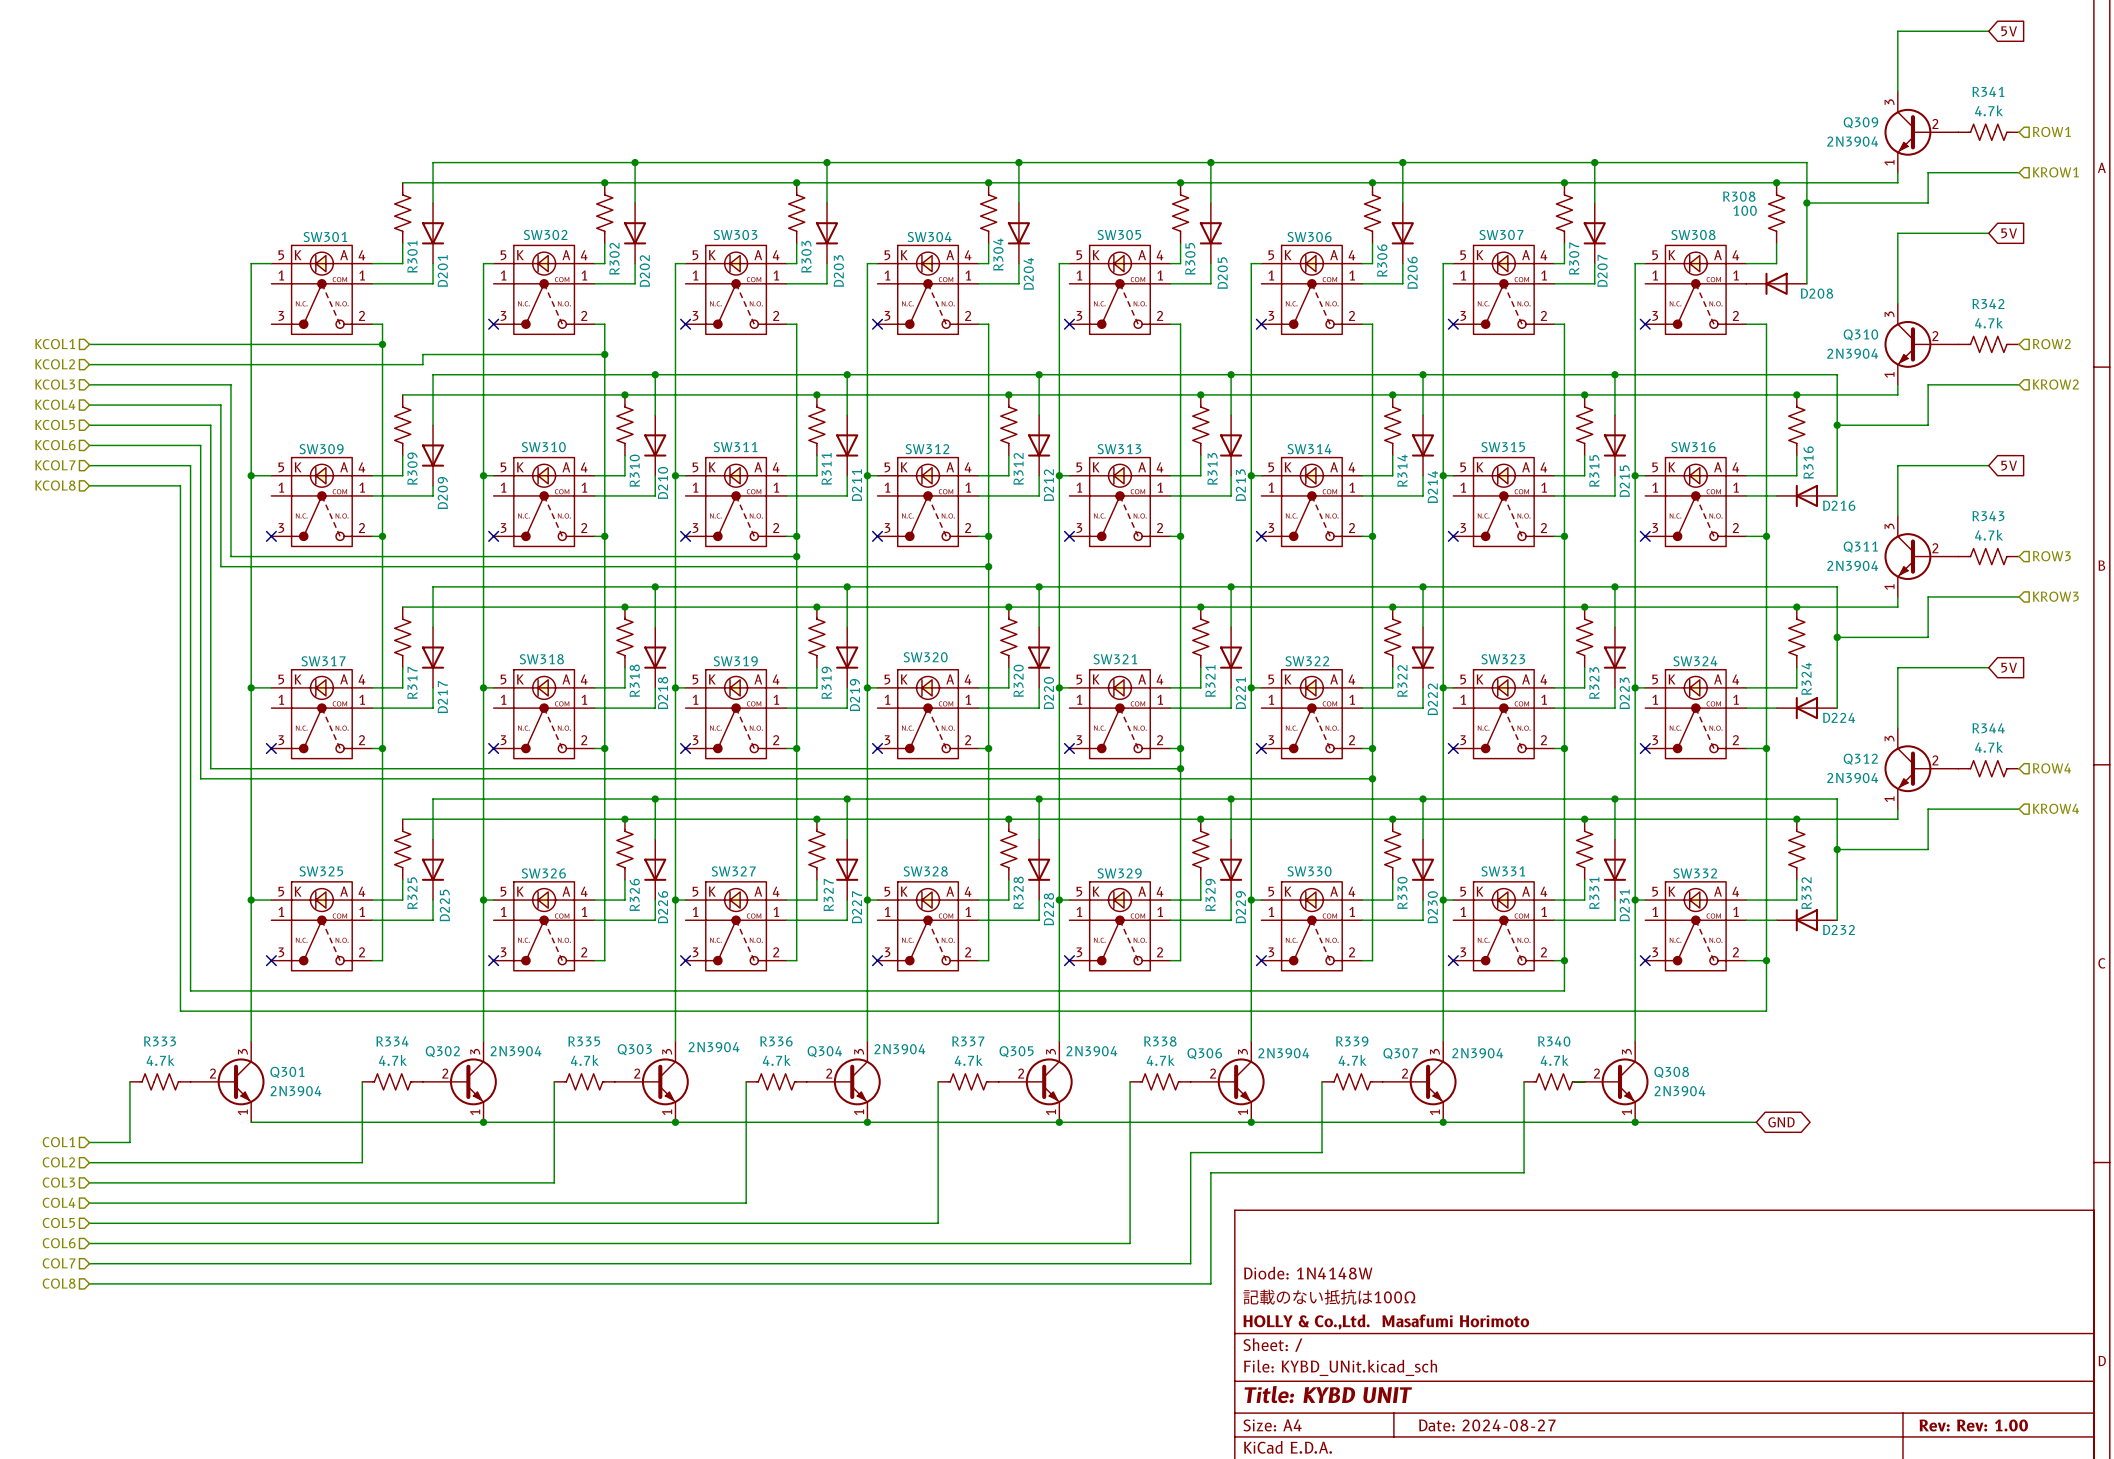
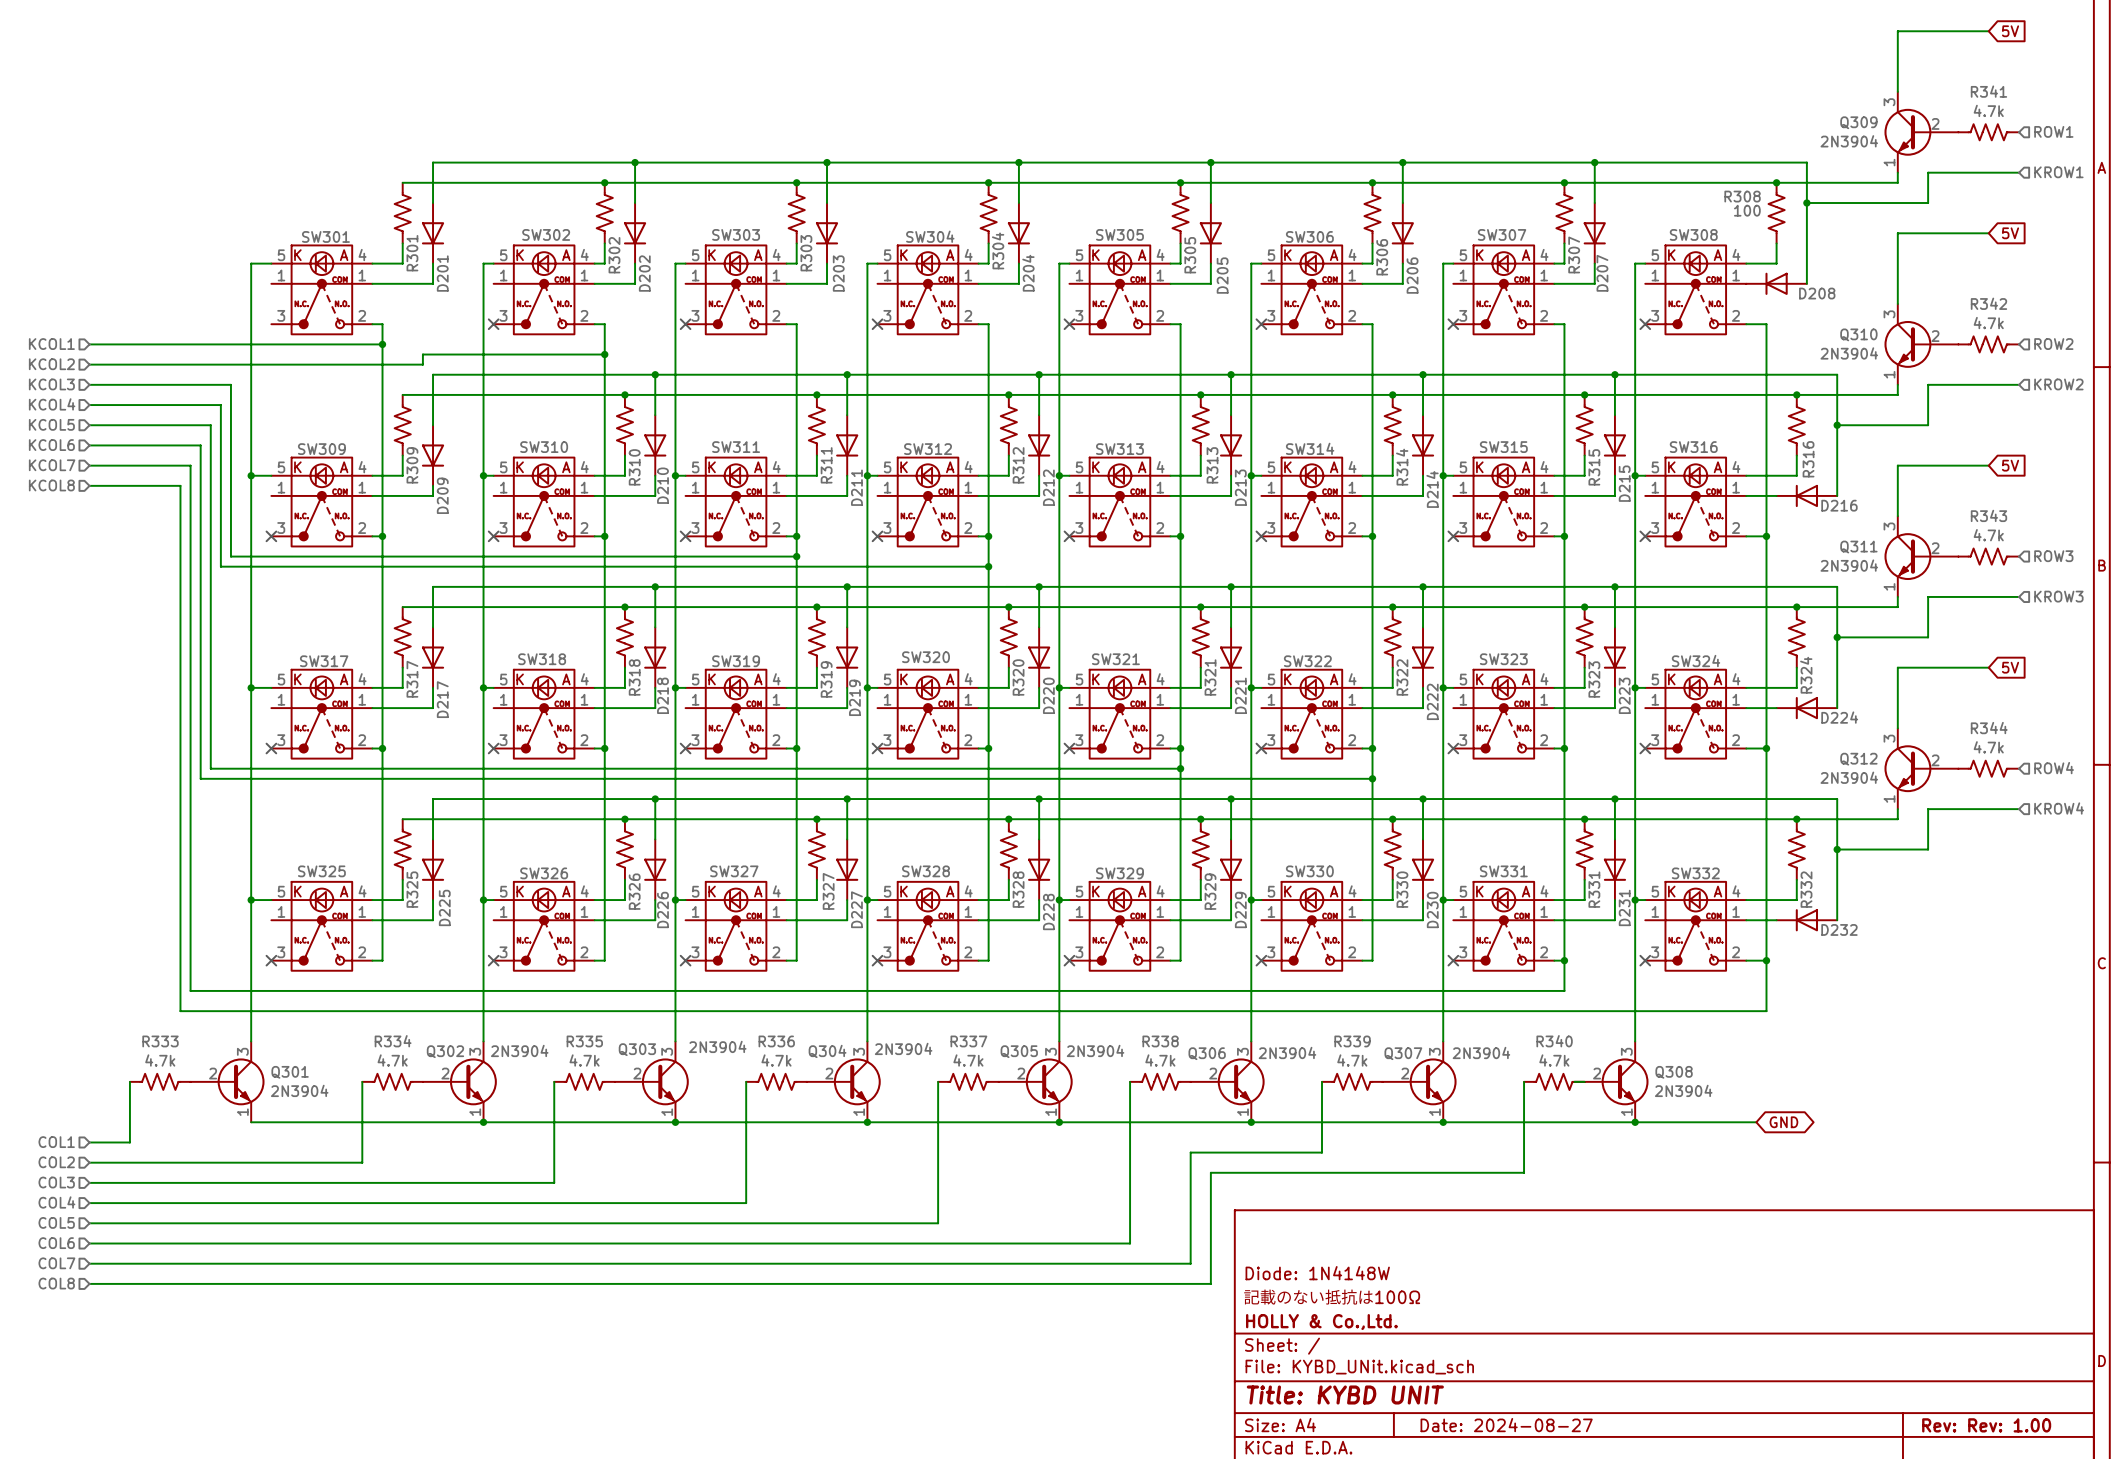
title block: HOLLY & Co.,Ltd. Masafumi Horimoto (1386, 1321) -> HOLLY & Co.,Ltd. (1321, 1322)

